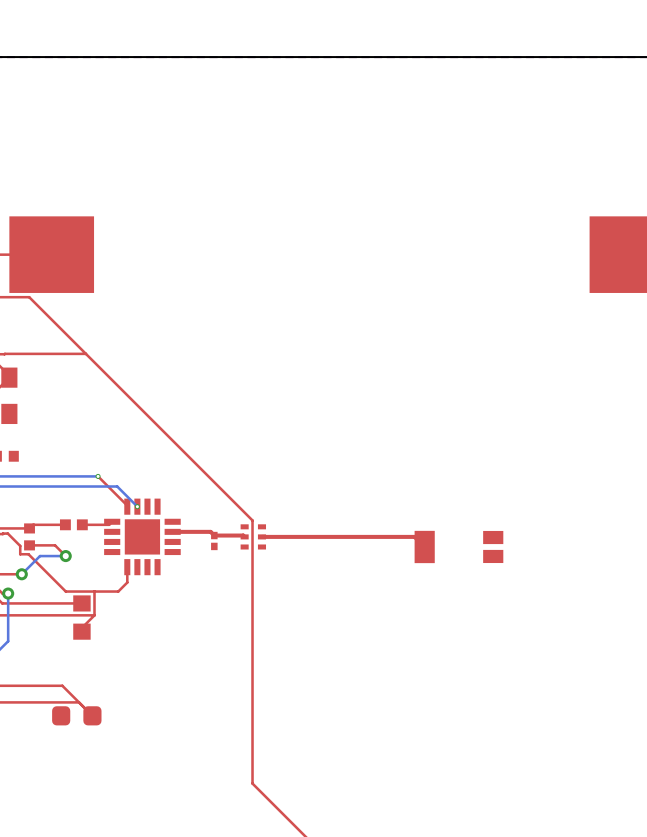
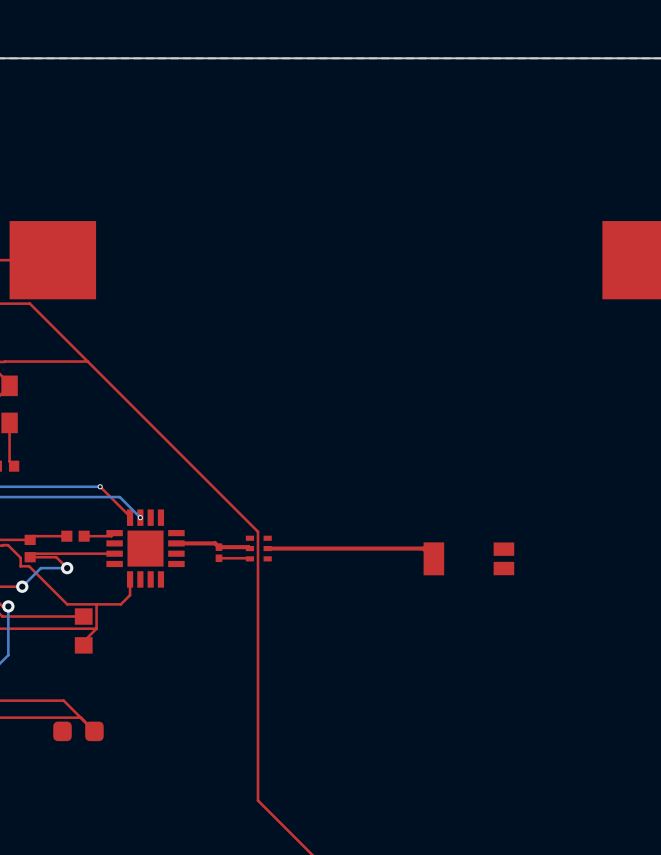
top track: none -> (9, 422) (9, 461) (14, 466)
top track: none -> (114, 553) (33, 553) (30, 557)
top track: none -> (218, 558) (249, 558)

